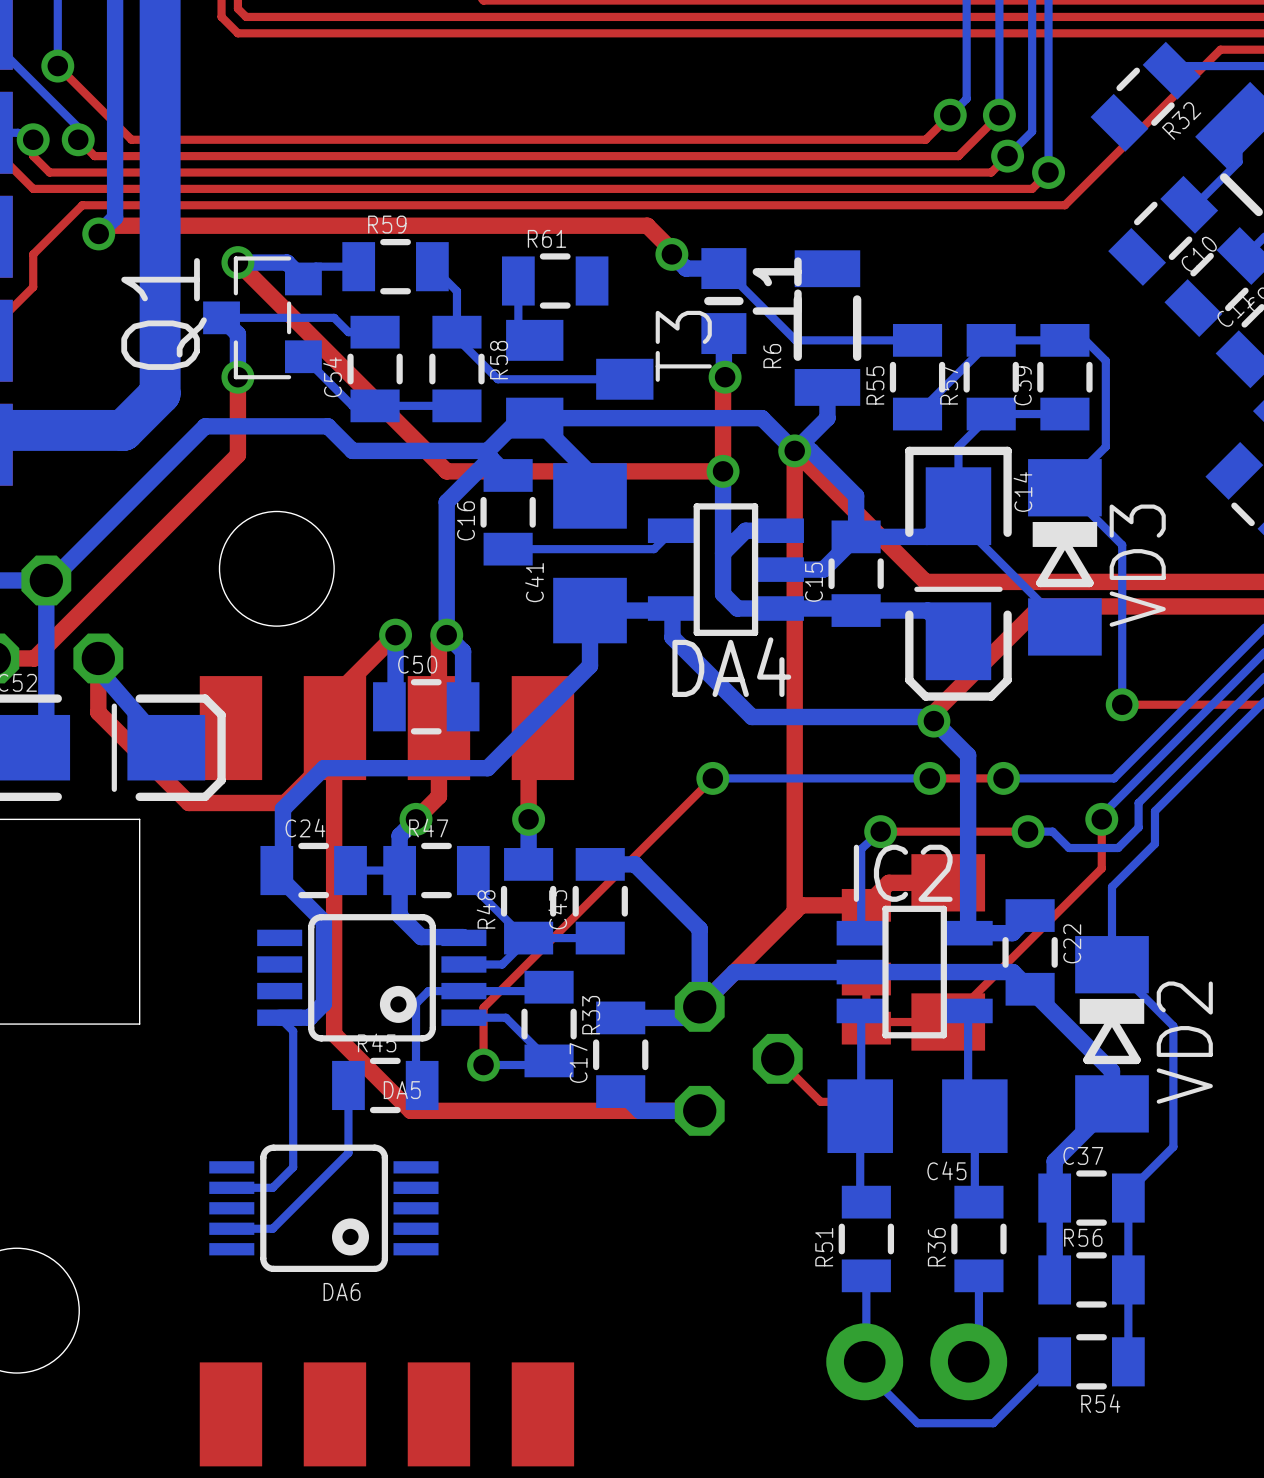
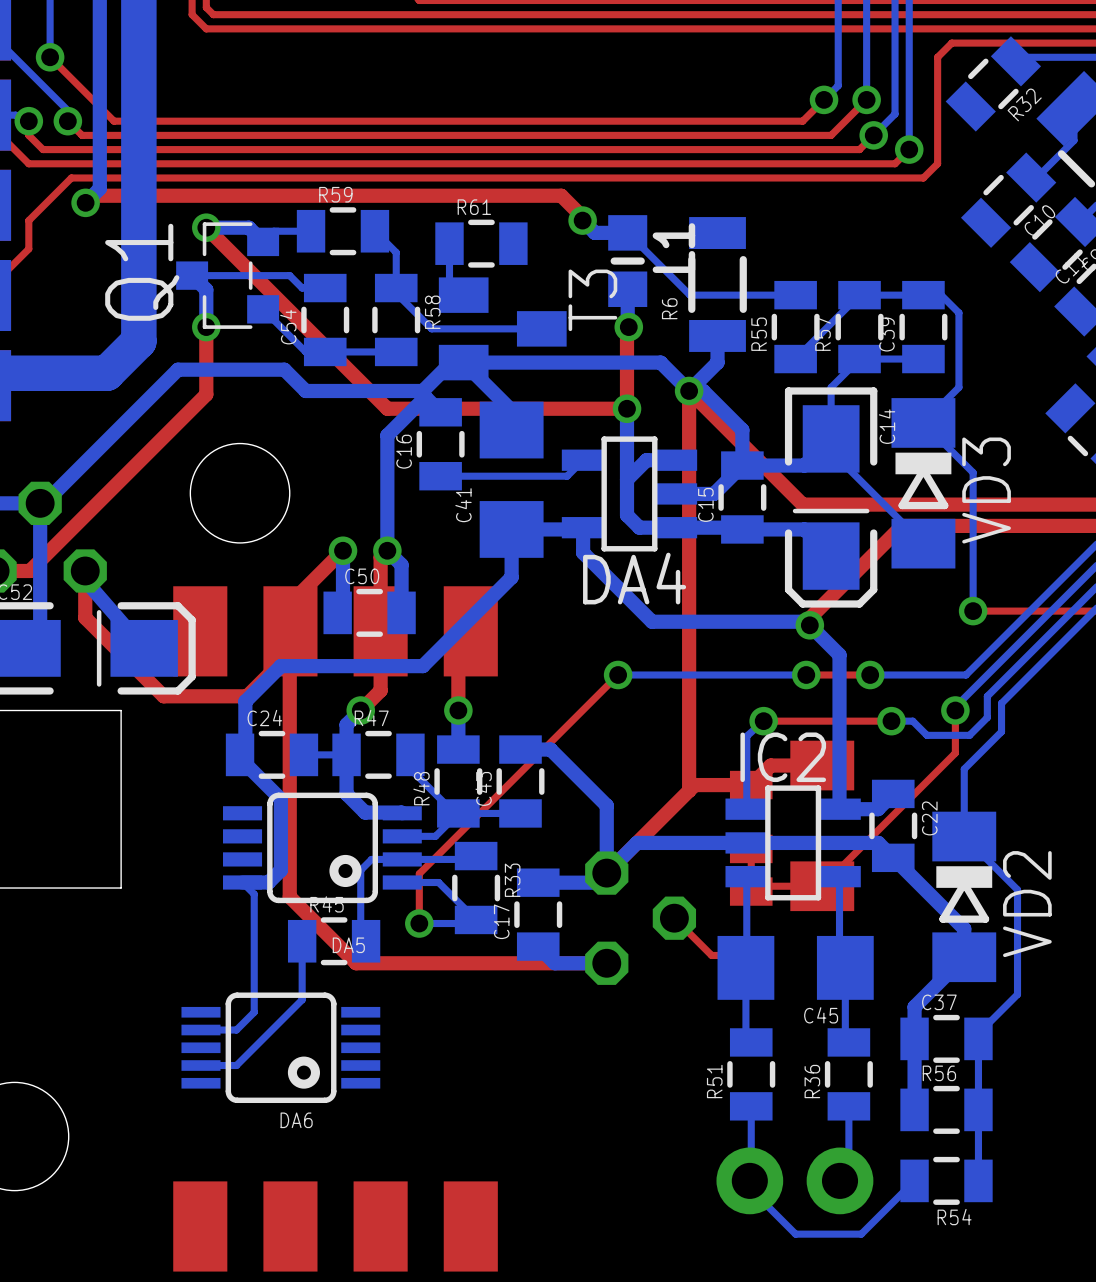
top track: (1220, 49) (1081, 188) -> (1058, 43) (951, 43) (937, 57) (937, 163)

